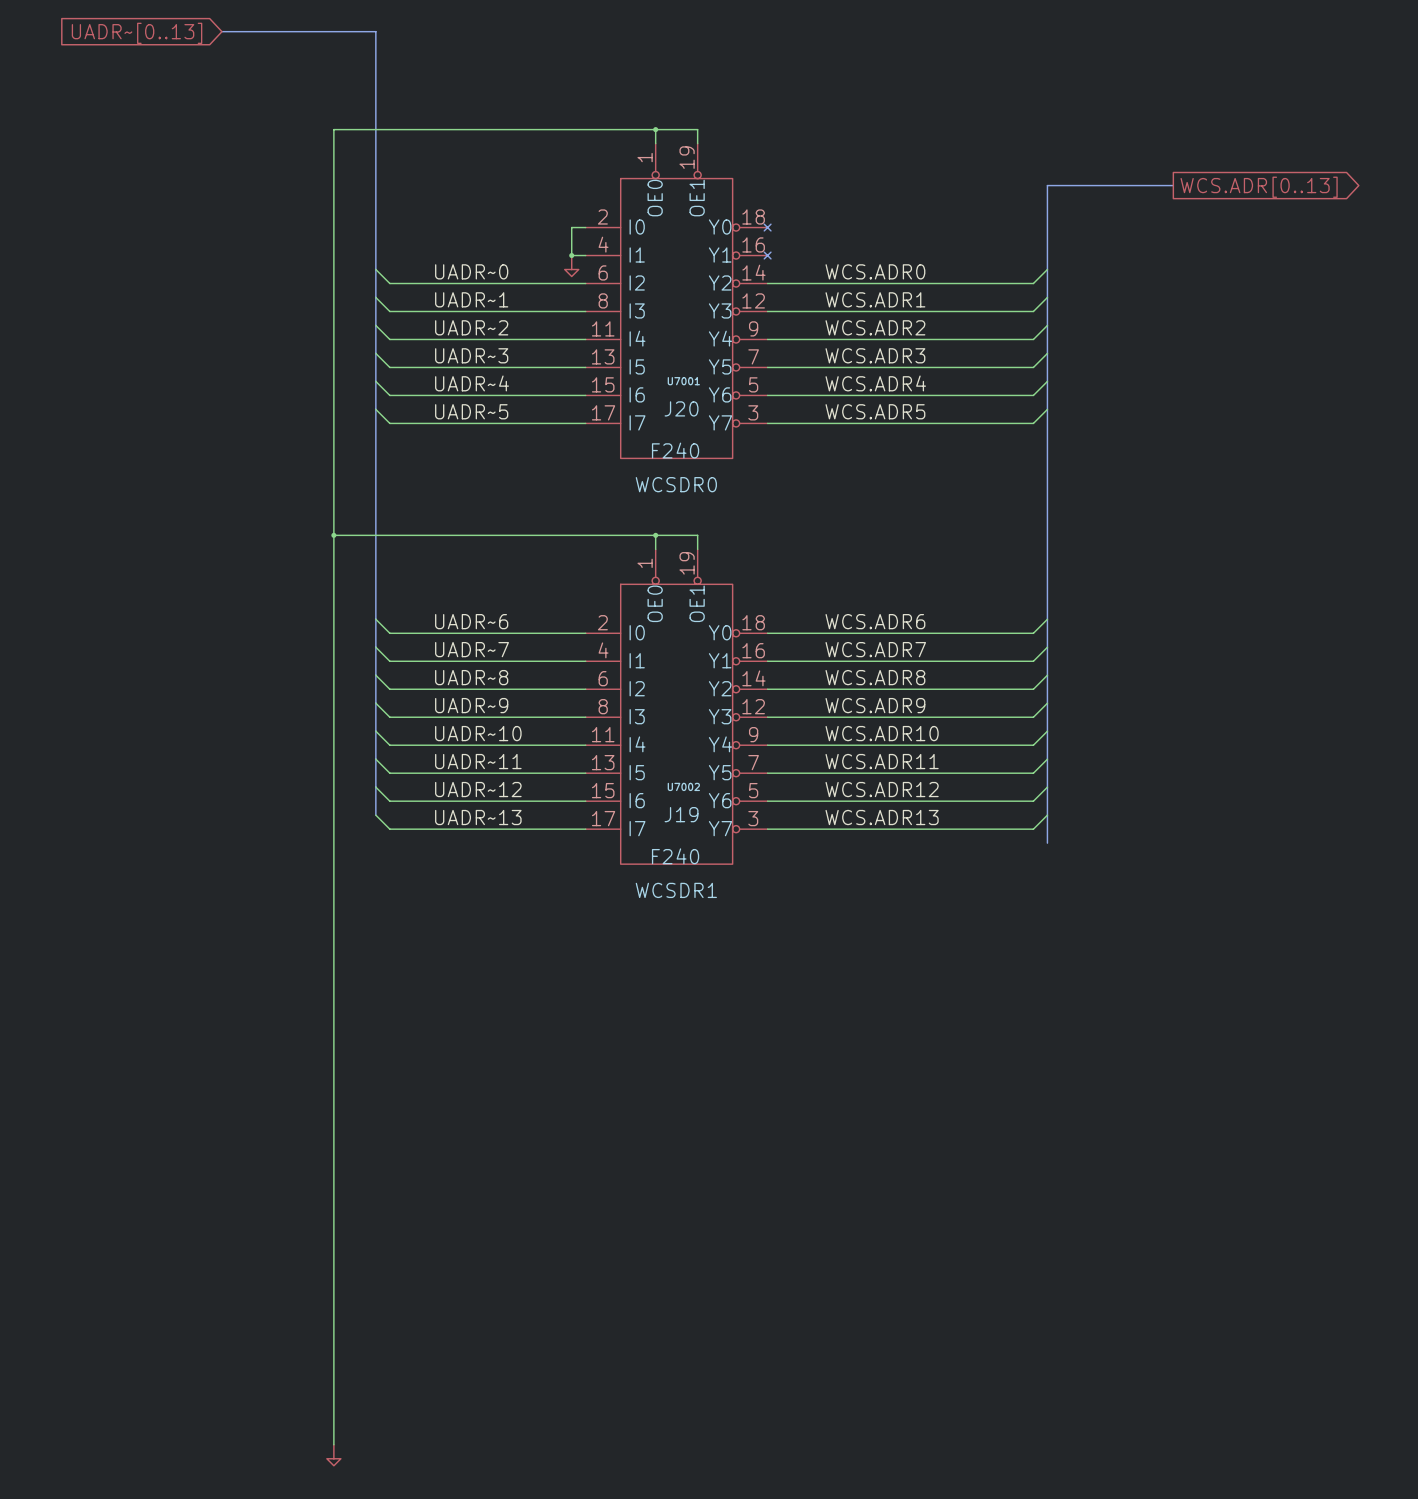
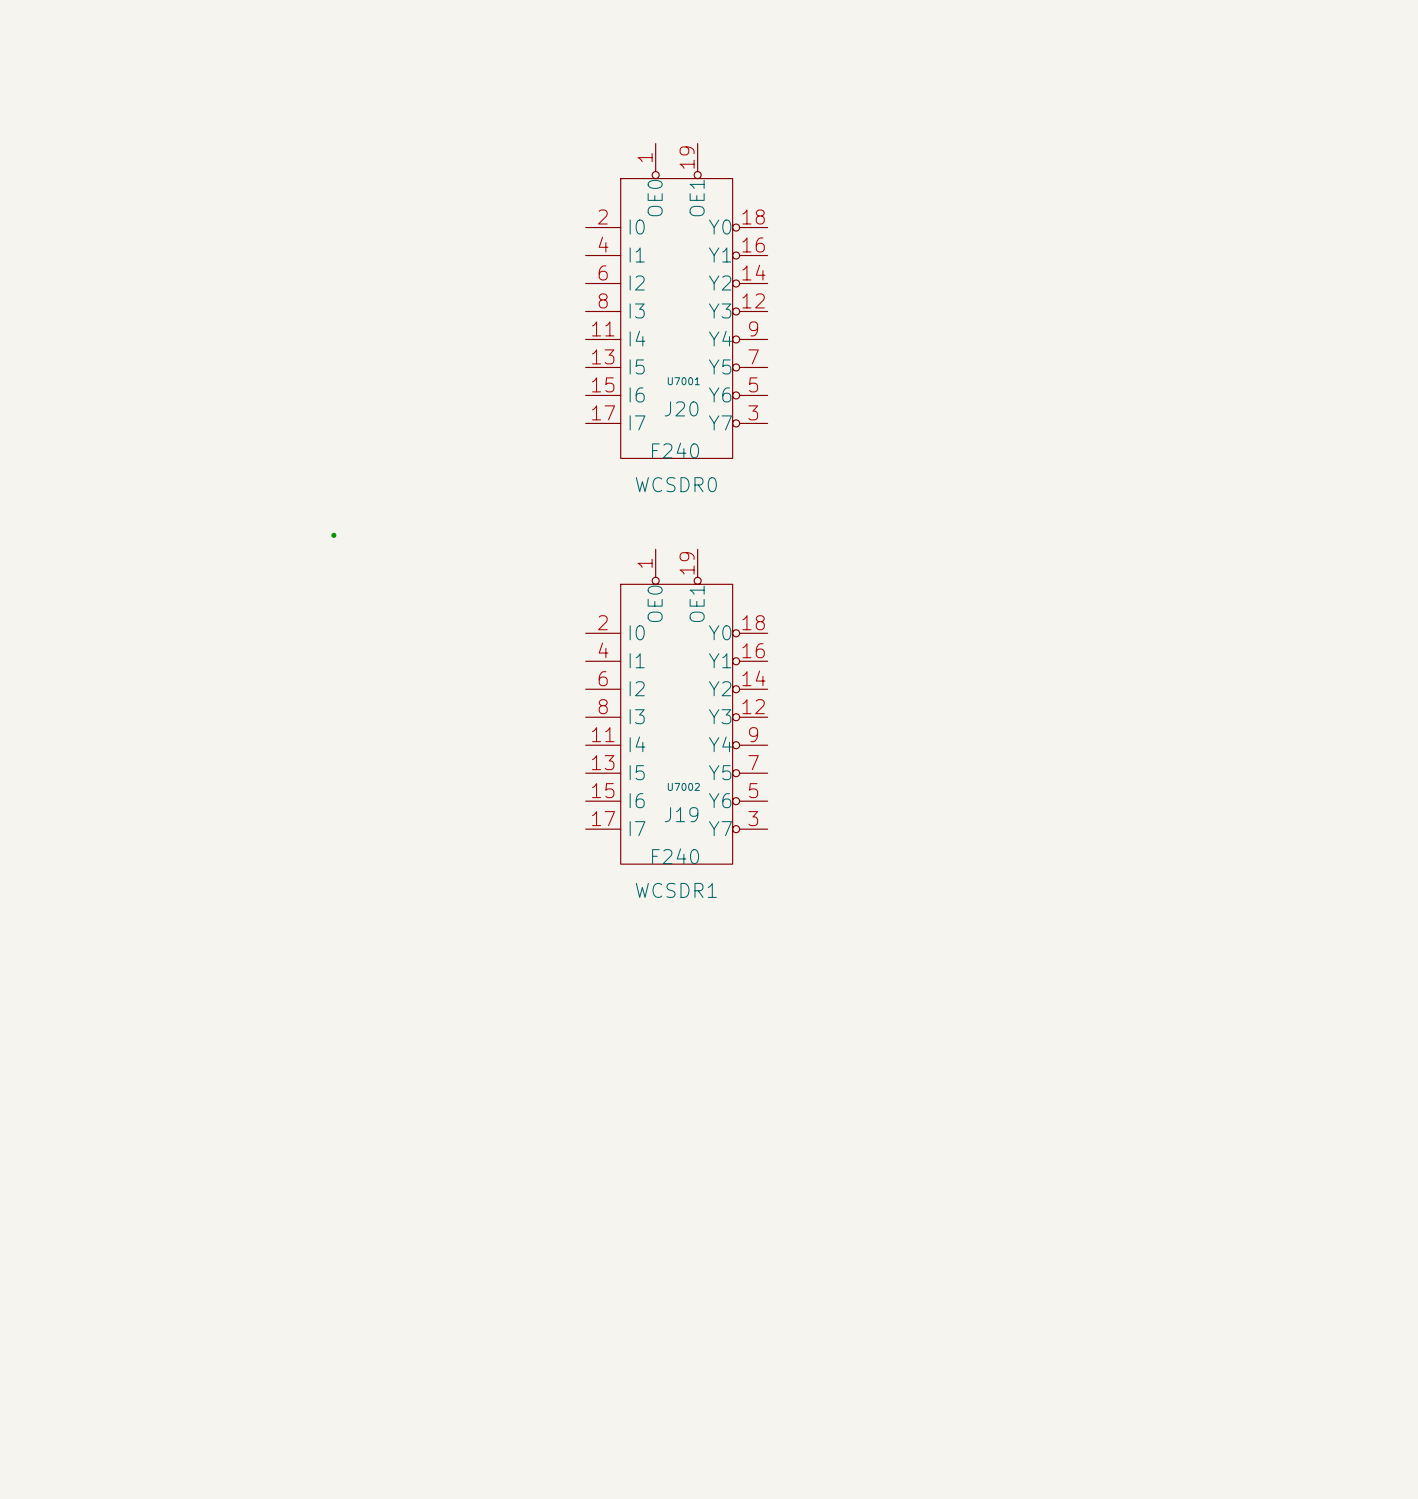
bus: (221, 31) (375, 31) (375, 815) -> none
global label: UADR~[0..13] (137, 33) -> none
wire: (655, 129) (655, 143) -> none
junction: (655, 129) -> none
wire: (697, 143) (697, 129) (333, 129) (333, 1444) -> none
bus: (1173, 185) (1047, 185) (1047, 843) -> none
global label: WCS.ADR[0..13] (1259, 187) -> none
wire: (585, 227) (571, 227) (571, 255) (585, 255) -> none
no-connect mark: (767, 227) -> none
junction: (571, 255) -> none
no-connect mark: (767, 255) -> none
power symbol: (571, 266) -> none
wire: (375, 269) (389, 283) (585, 283) -> none
wire: (1047, 269) (1033, 283) (767, 283) -> none
label: UADR~0 (471, 271) -> none
label: WCS.ADR0 (875, 271) -> none
wire: (375, 297) (389, 311) (585, 311) -> none
wire: (1047, 297) (1033, 311) (767, 311) -> none
label: UADR~1 (471, 299) -> none
label: WCS.ADR1 (875, 299) -> none
wire: (375, 325) (389, 339) (585, 339) -> none
wire: (1047, 325) (1033, 339) (767, 339) -> none
label: UADR~2 (471, 327) -> none
label: WCS.ADR2 (875, 327) -> none
wire: (375, 353) (389, 367) (585, 367) -> none
wire: (1047, 353) (1033, 367) (767, 367) -> none
label: UADR~3 (471, 355) -> none
label: WCS.ADR3 (875, 355) -> none
wire: (375, 381) (389, 395) (585, 395) -> none
wire: (1047, 381) (1033, 395) (767, 395) -> none
label: UADR~4 (472, 383) -> none
label: WCS.ADR4 (875, 383) -> none
wire: (375, 409) (389, 423) (585, 423) -> none
wire: (1047, 409) (1033, 423) (767, 423) -> none
label: UADR~5 (471, 411) -> none
label: WCS.ADR5 (875, 411) -> none
wire: (333, 535) (697, 535) (697, 549) -> none
wire: (655, 535) (655, 549) -> none
junction: (655, 535) -> none
wire: (375, 619) (389, 633) (585, 633) -> none
wire: (1047, 619) (1033, 633) (767, 633) -> none
label: UADR~6 (471, 621) -> none
label: WCS.ADR6 (875, 621) -> none
wire: (375, 647) (389, 661) (585, 661) -> none
wire: (1047, 647) (1033, 661) (767, 661) -> none
label: UADR~7 (472, 649) -> none
label: WCS.ADR7 (875, 649) -> none
wire: (375, 675) (389, 689) (585, 689) -> none
wire: (1047, 675) (1033, 689) (767, 689) -> none
label: UADR~8 (471, 677) -> none
label: WCS.ADR8 (875, 677) -> none
wire: (375, 703) (389, 717) (585, 717) -> none
wire: (1047, 703) (1033, 717) (767, 717) -> none
label: UADR~9 (471, 705) -> none
label: WCS.ADR9 (875, 705) -> none
wire: (375, 731) (389, 745) (585, 745) -> none
wire: (1047, 731) (1033, 745) (767, 745) -> none
label: UADR~10 (478, 733) -> none
label: WCS.ADR10 (882, 733) -> none
wire: (375, 759) (389, 773) (585, 773) -> none
wire: (1047, 759) (1033, 773) (767, 773) -> none
label: UADR~11 (478, 761) -> none
label: WCS.ADR11 (882, 761) -> none
wire: (375, 787) (389, 801) (585, 801) -> none
wire: (1047, 787) (1033, 801) (767, 801) -> none
label: UADR~12 (478, 789) -> none
label: WCS.ADR12 (882, 789) -> none
wire: (375, 815) (389, 829) (585, 829) -> none
wire: (1047, 815) (1033, 829) (767, 829) -> none
label: UADR~13 (478, 817) -> none
label: WCS.ADR13 (882, 817) -> none
power symbol: (333, 1455) -> none

